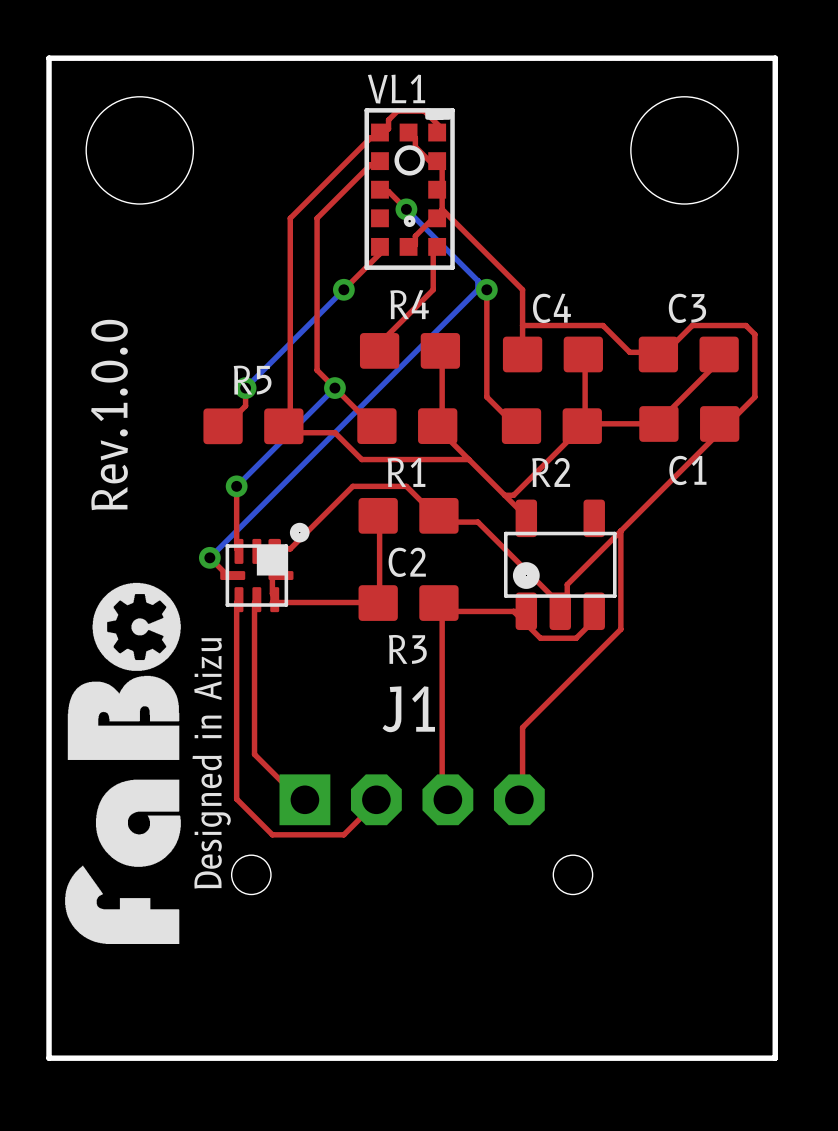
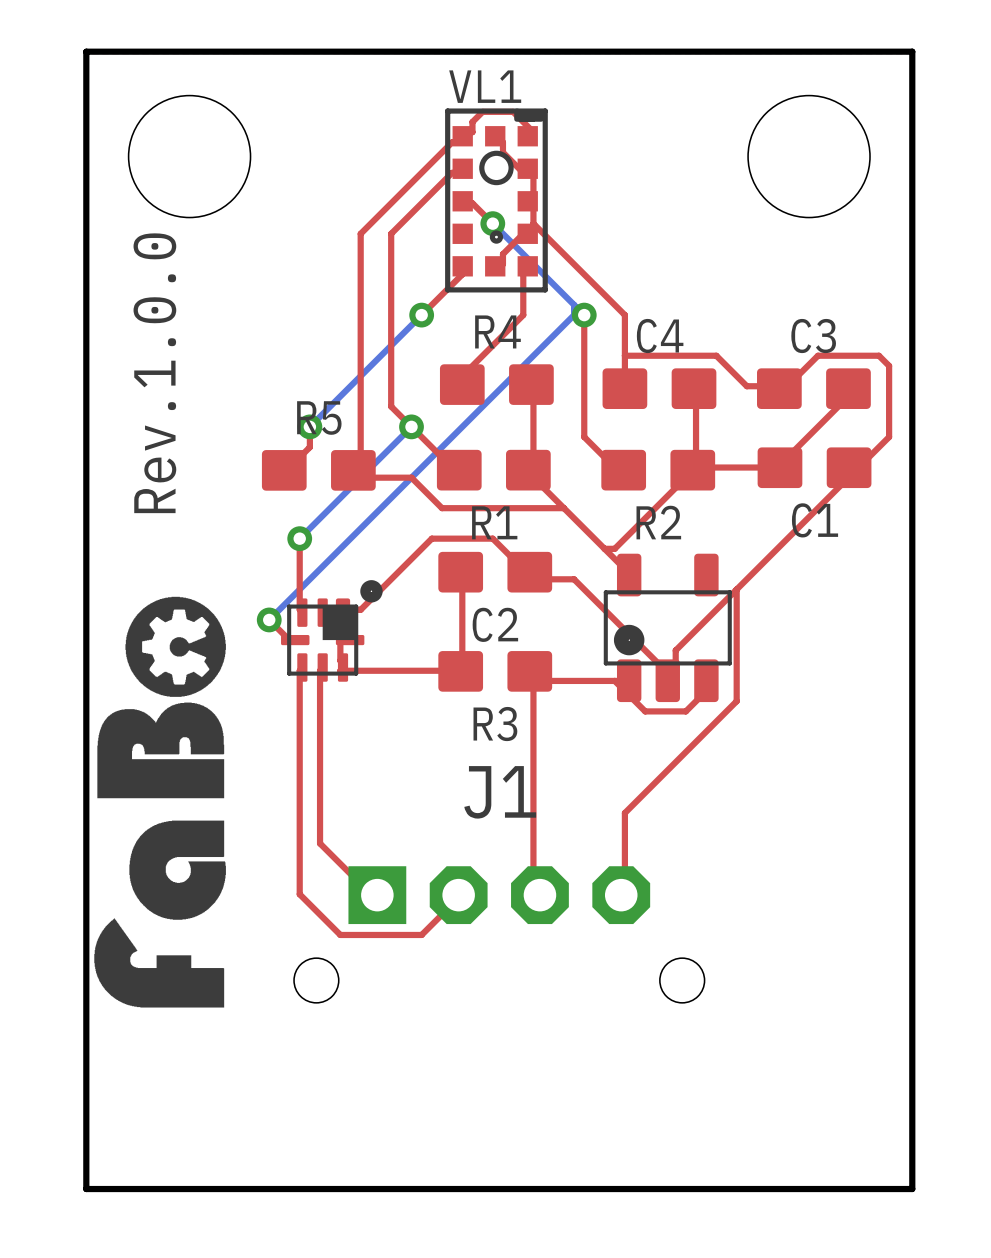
text position: Rev.1.0.0 (109, 414) -> Rev.1.0.0 (154, 373)
drawing position: (122, 763) -> (160, 802)
text: Designed in Aizu (211, 763) -> none

